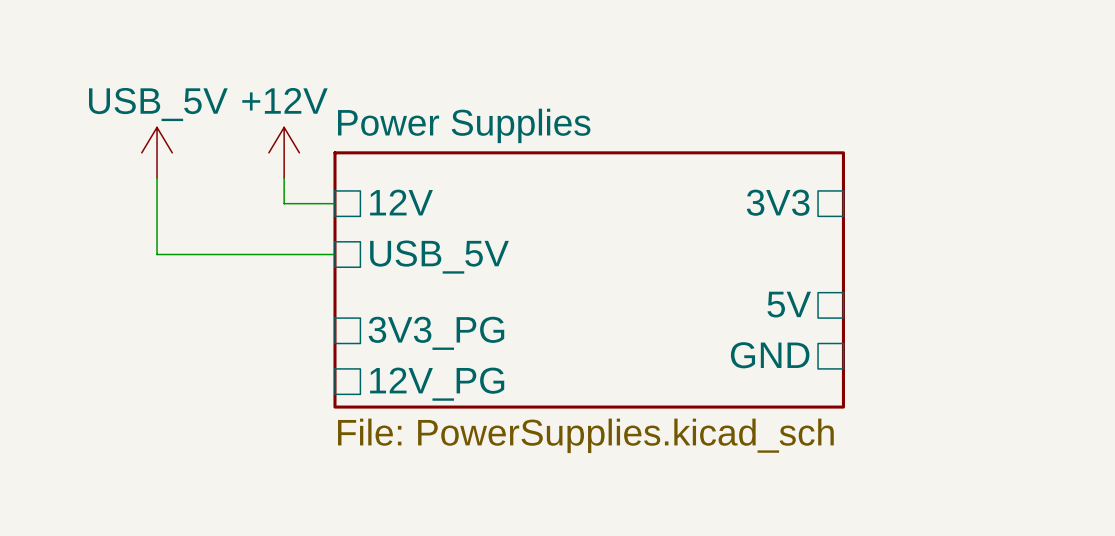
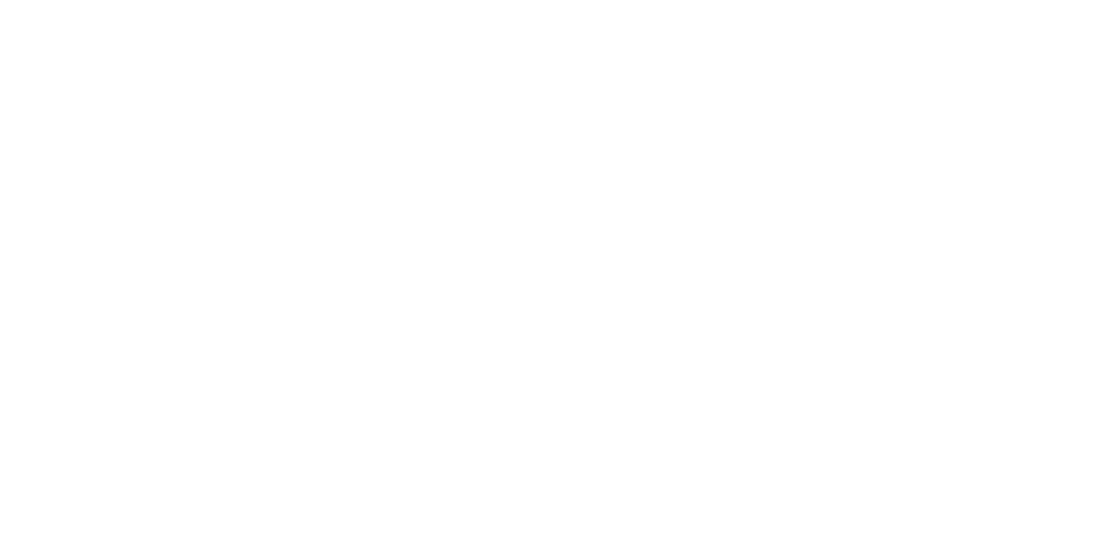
power symbol: USB_5V (157, 152) -> none
power symbol: +12V (284, 152) -> none
wire: (157, 178) (157, 254) (334, 254) -> none
wire: (284, 178) (284, 203) (334, 203) -> none
sheet pin: 12V (401, 202) -> none
sheet pin: 3V3 (778, 202) -> none
sheet pin: USB_5V (439, 257) -> none
sheet Power Supplies: File: PowerSupplies.kicad_sch (589, 279) -> none
sheet pin: 5V (789, 304) -> none
sheet pin: 3V3_PG (436, 333) -> none
sheet pin: GND (770, 355) -> none
sheet pin: 12V_PG (437, 384) -> none

